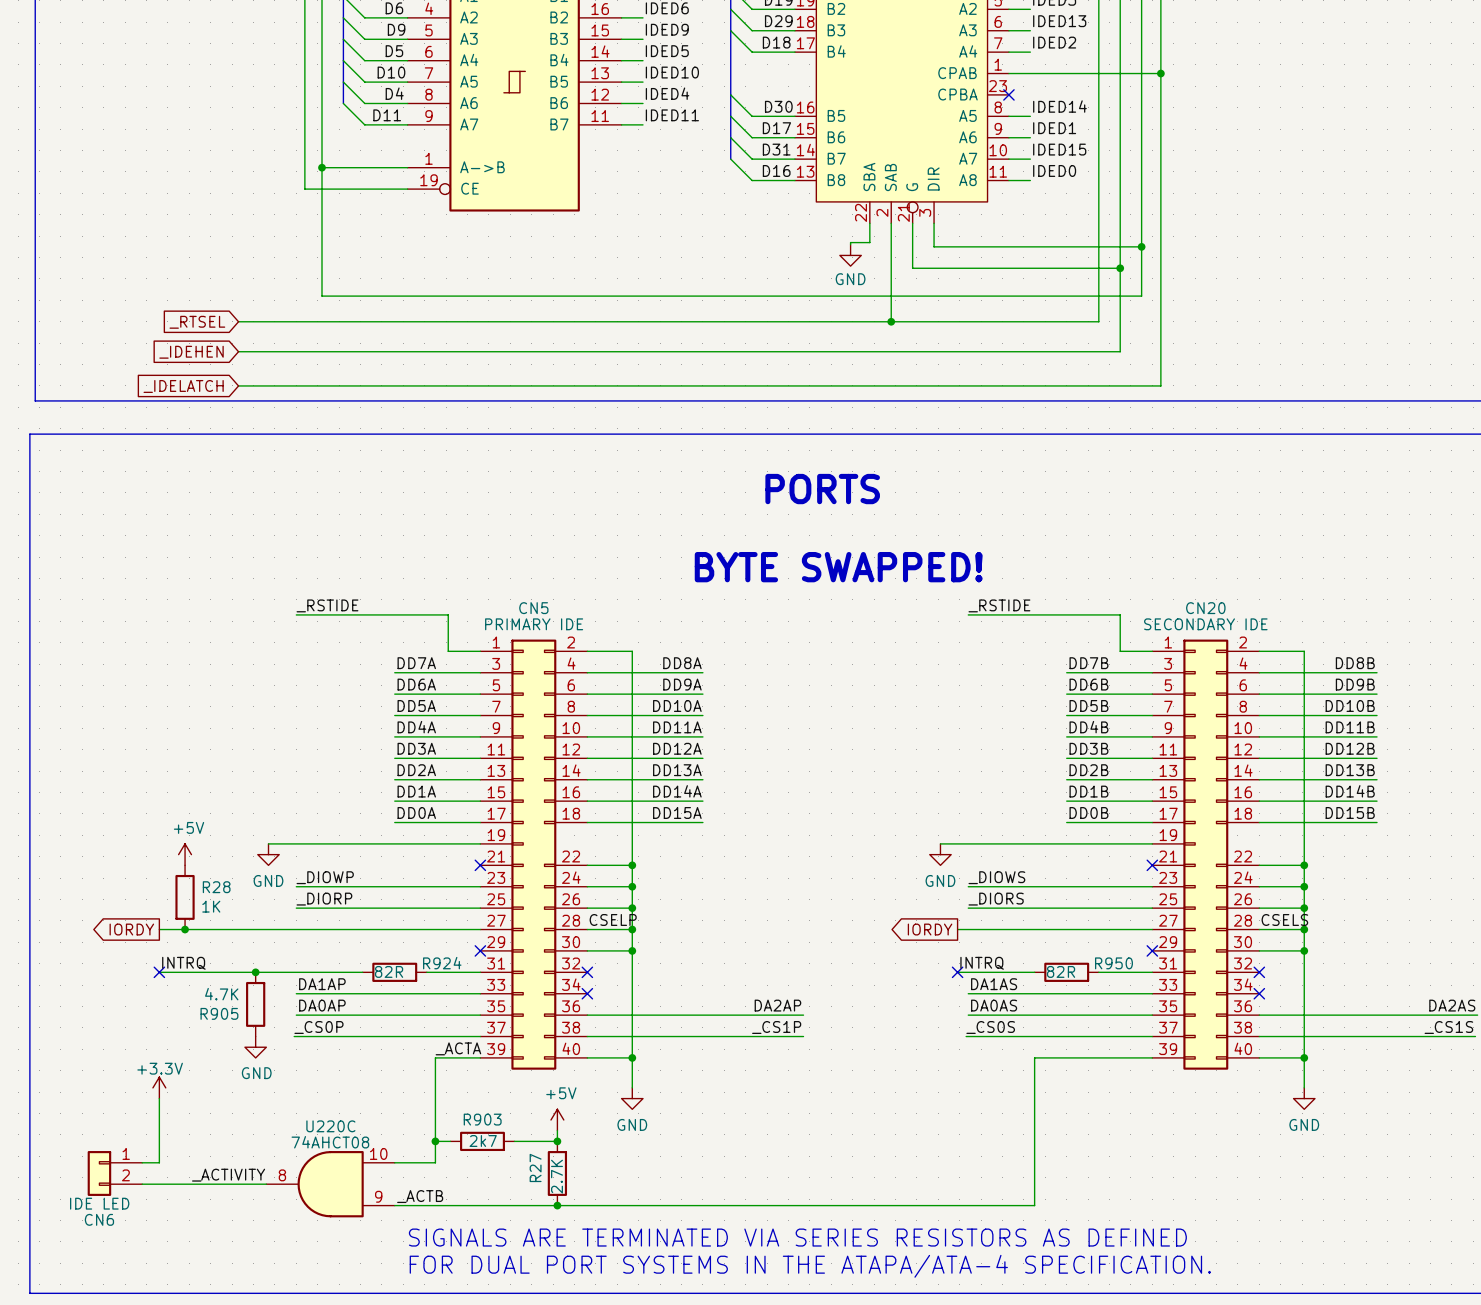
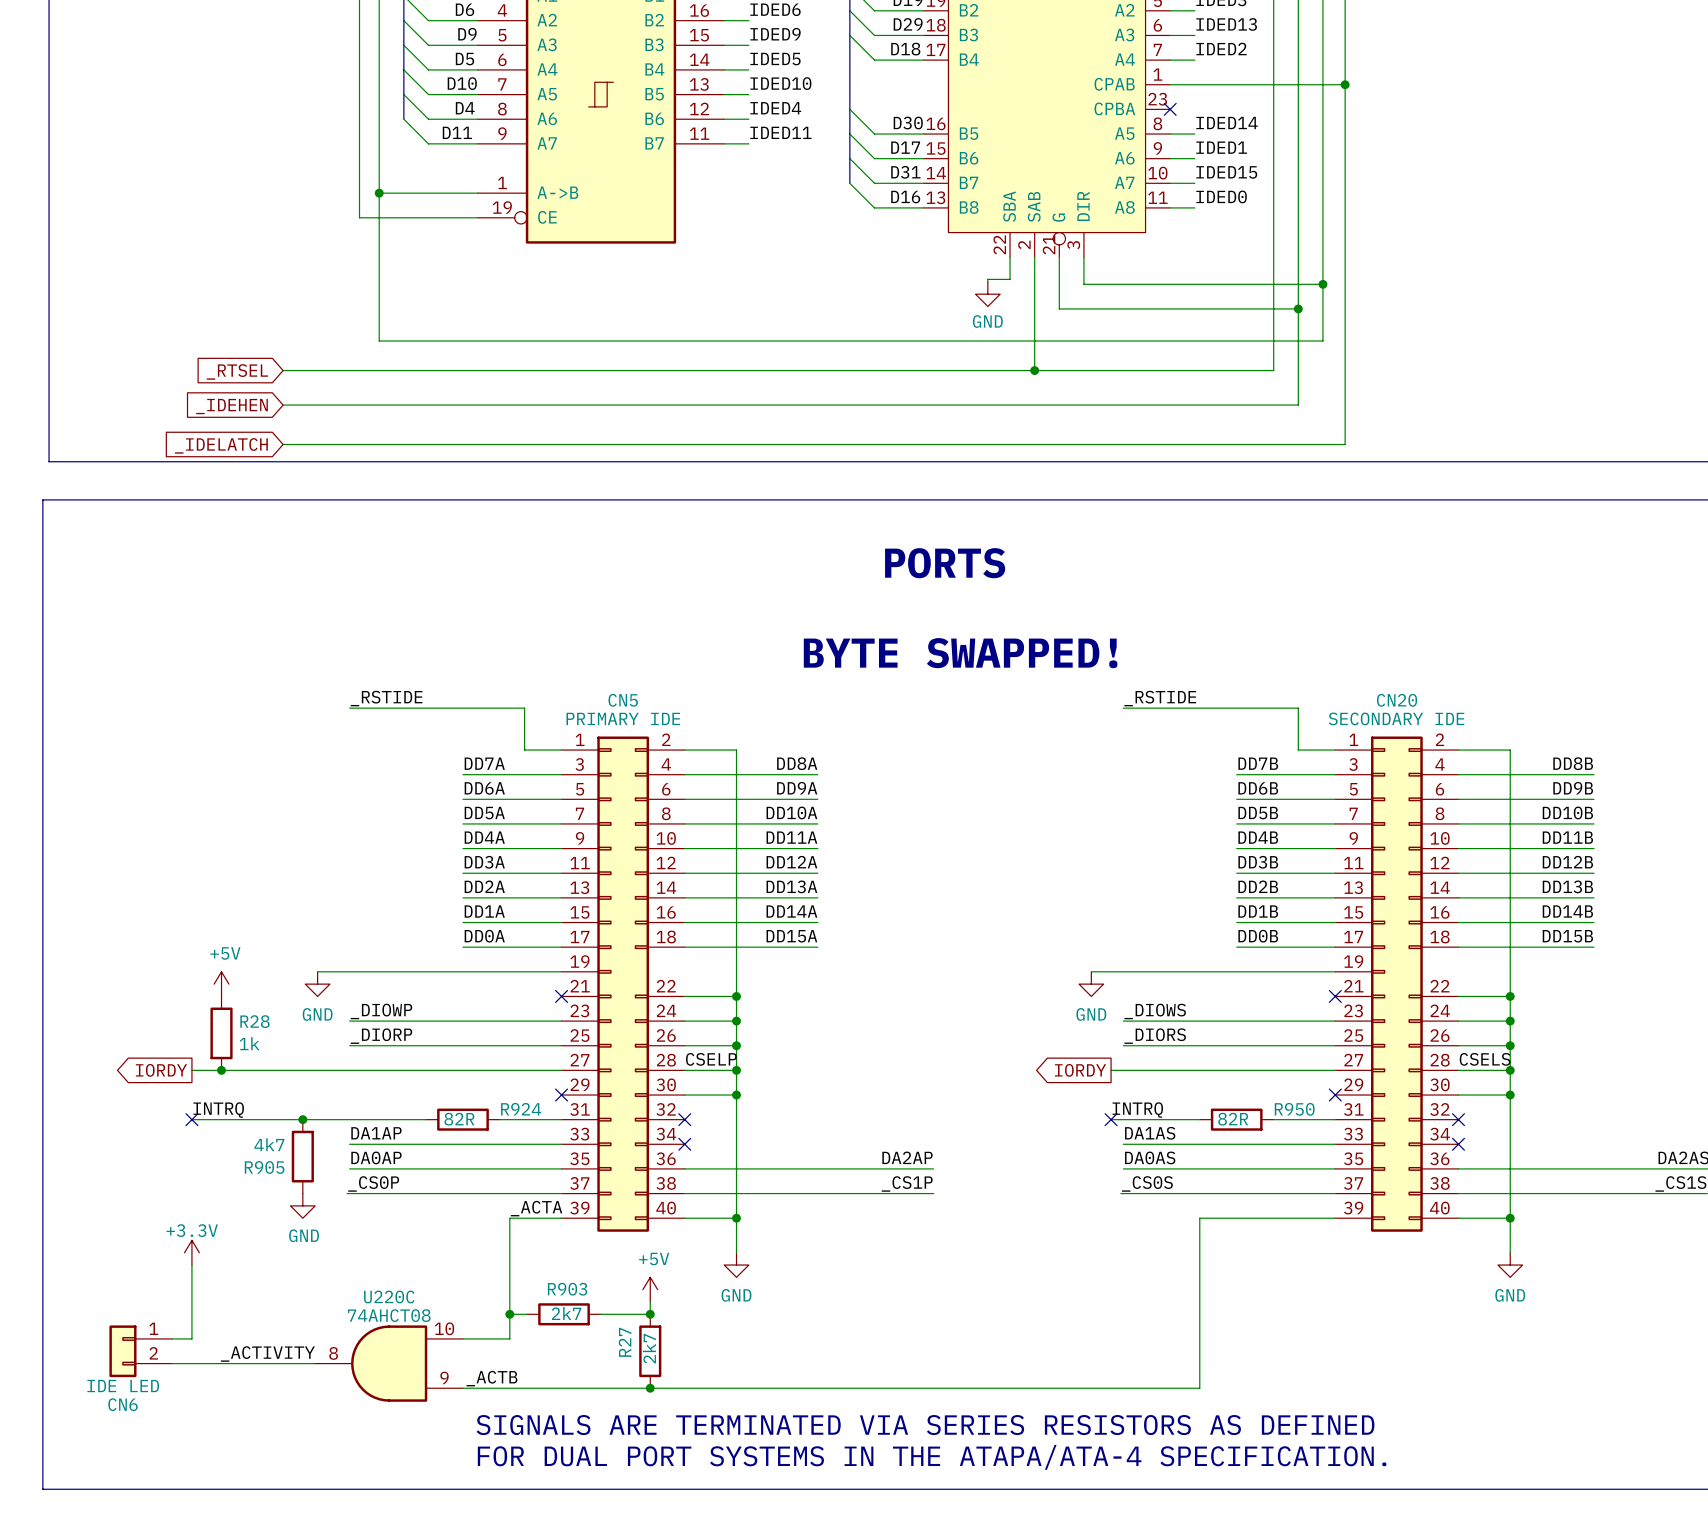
R28 value: 1K (211, 906) -> 1k (249, 1043)
R905 value: 4.7K (221, 994) -> 4k7 (269, 1144)
R27 value: 2.7K (557, 1176) -> 2k7 (649, 1348)

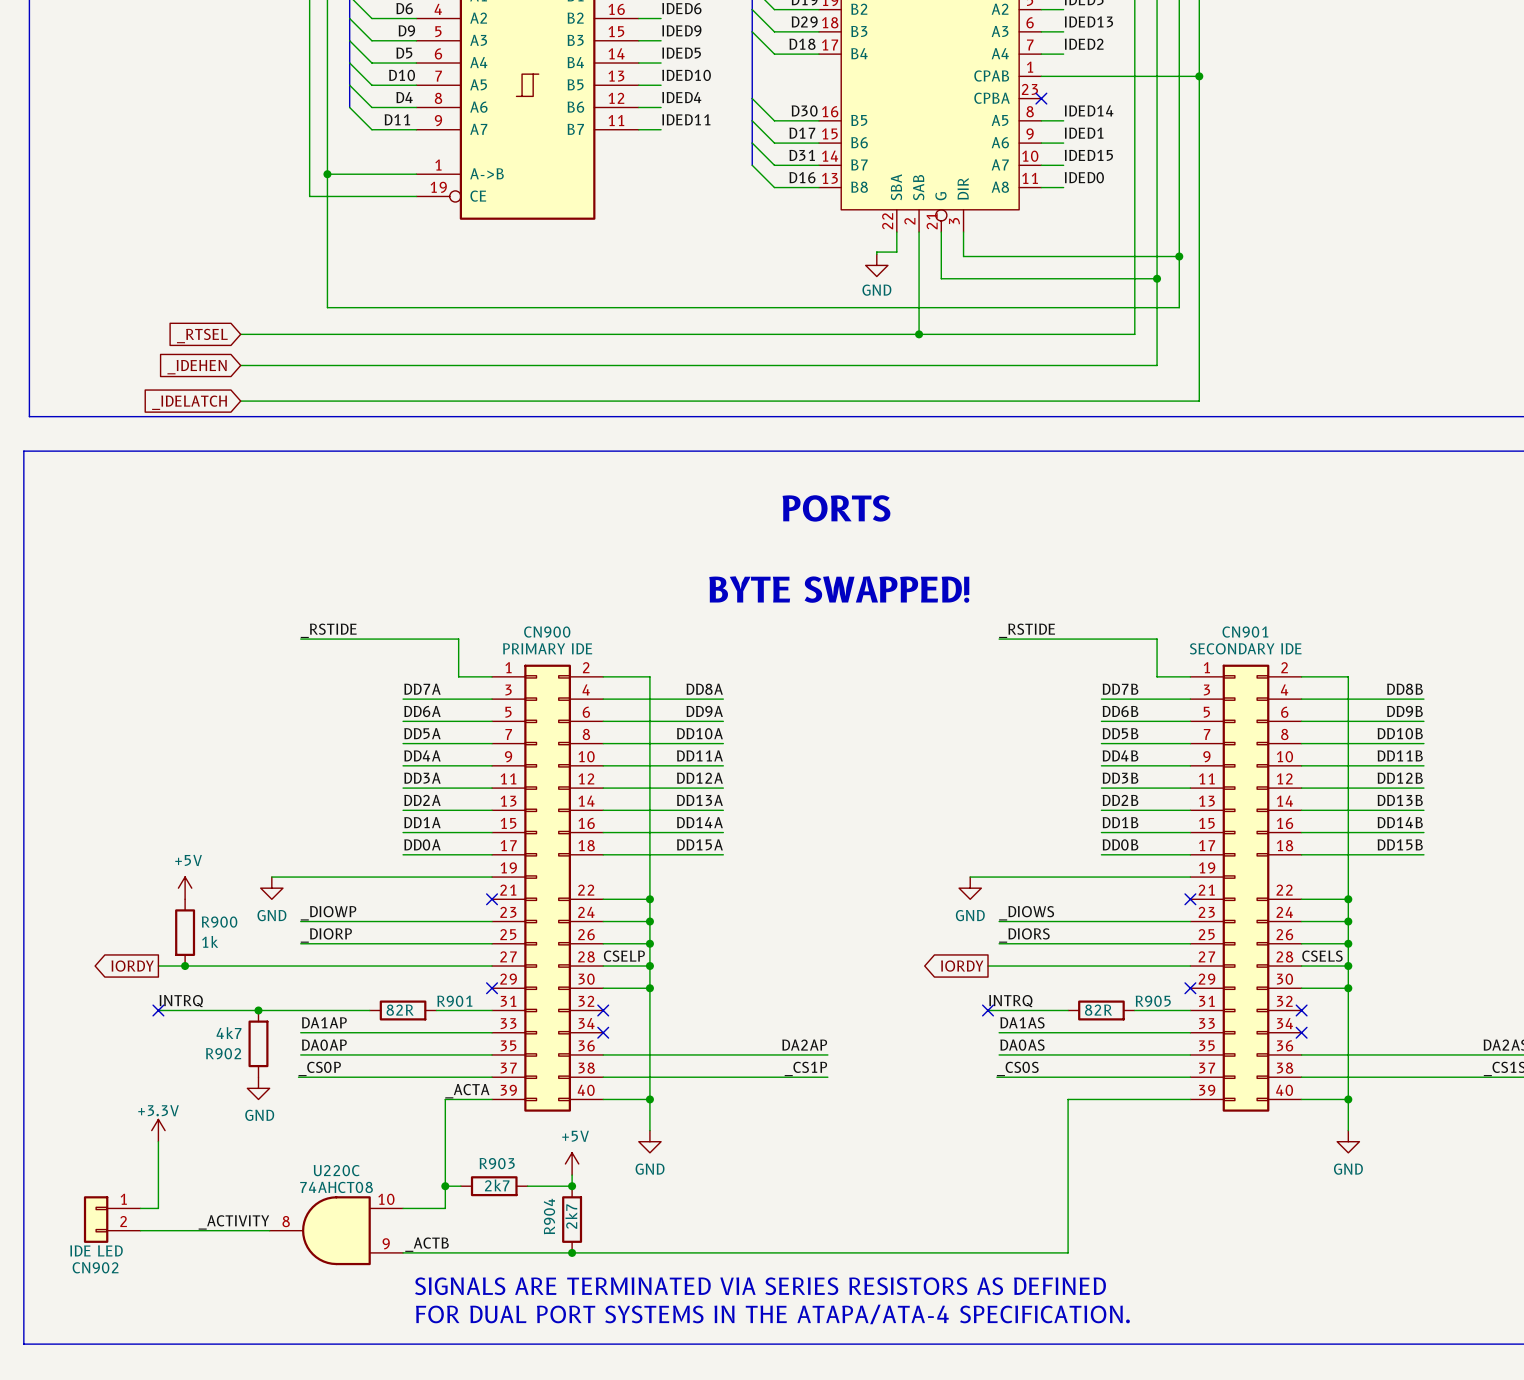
CN5 name: CN5 (623, 700) -> CN900 (547, 632)
CN20 name: CN20 (1397, 700) -> CN901 (1245, 632)
R28 name: R28 (254, 1021) -> R900 (219, 922)
R924 name: R924 (521, 1109) -> R901 (454, 1001)
R950 name: R950 (1294, 1109) -> R905 (1153, 1001)
R905 name: R905 (264, 1167) -> R902 (223, 1053)
R27 name: R27 (625, 1342) -> R904 (549, 1216)
CN6 name: CN6 (123, 1404) -> CN902 (95, 1267)

